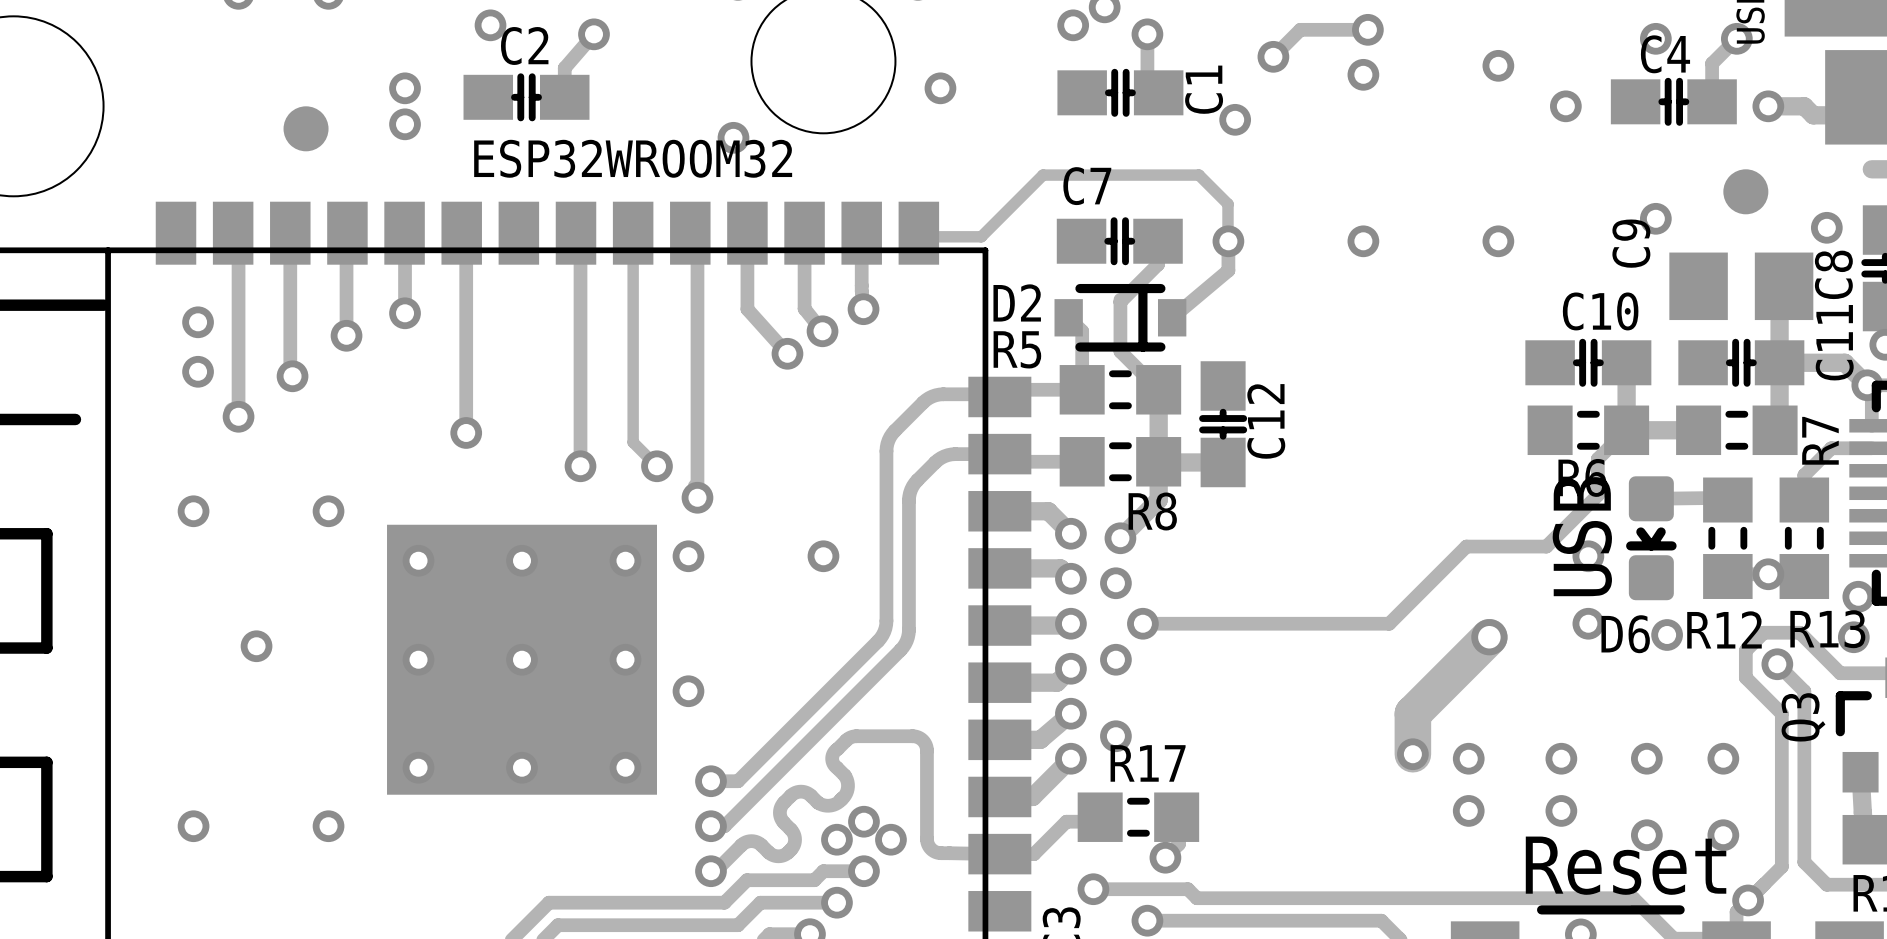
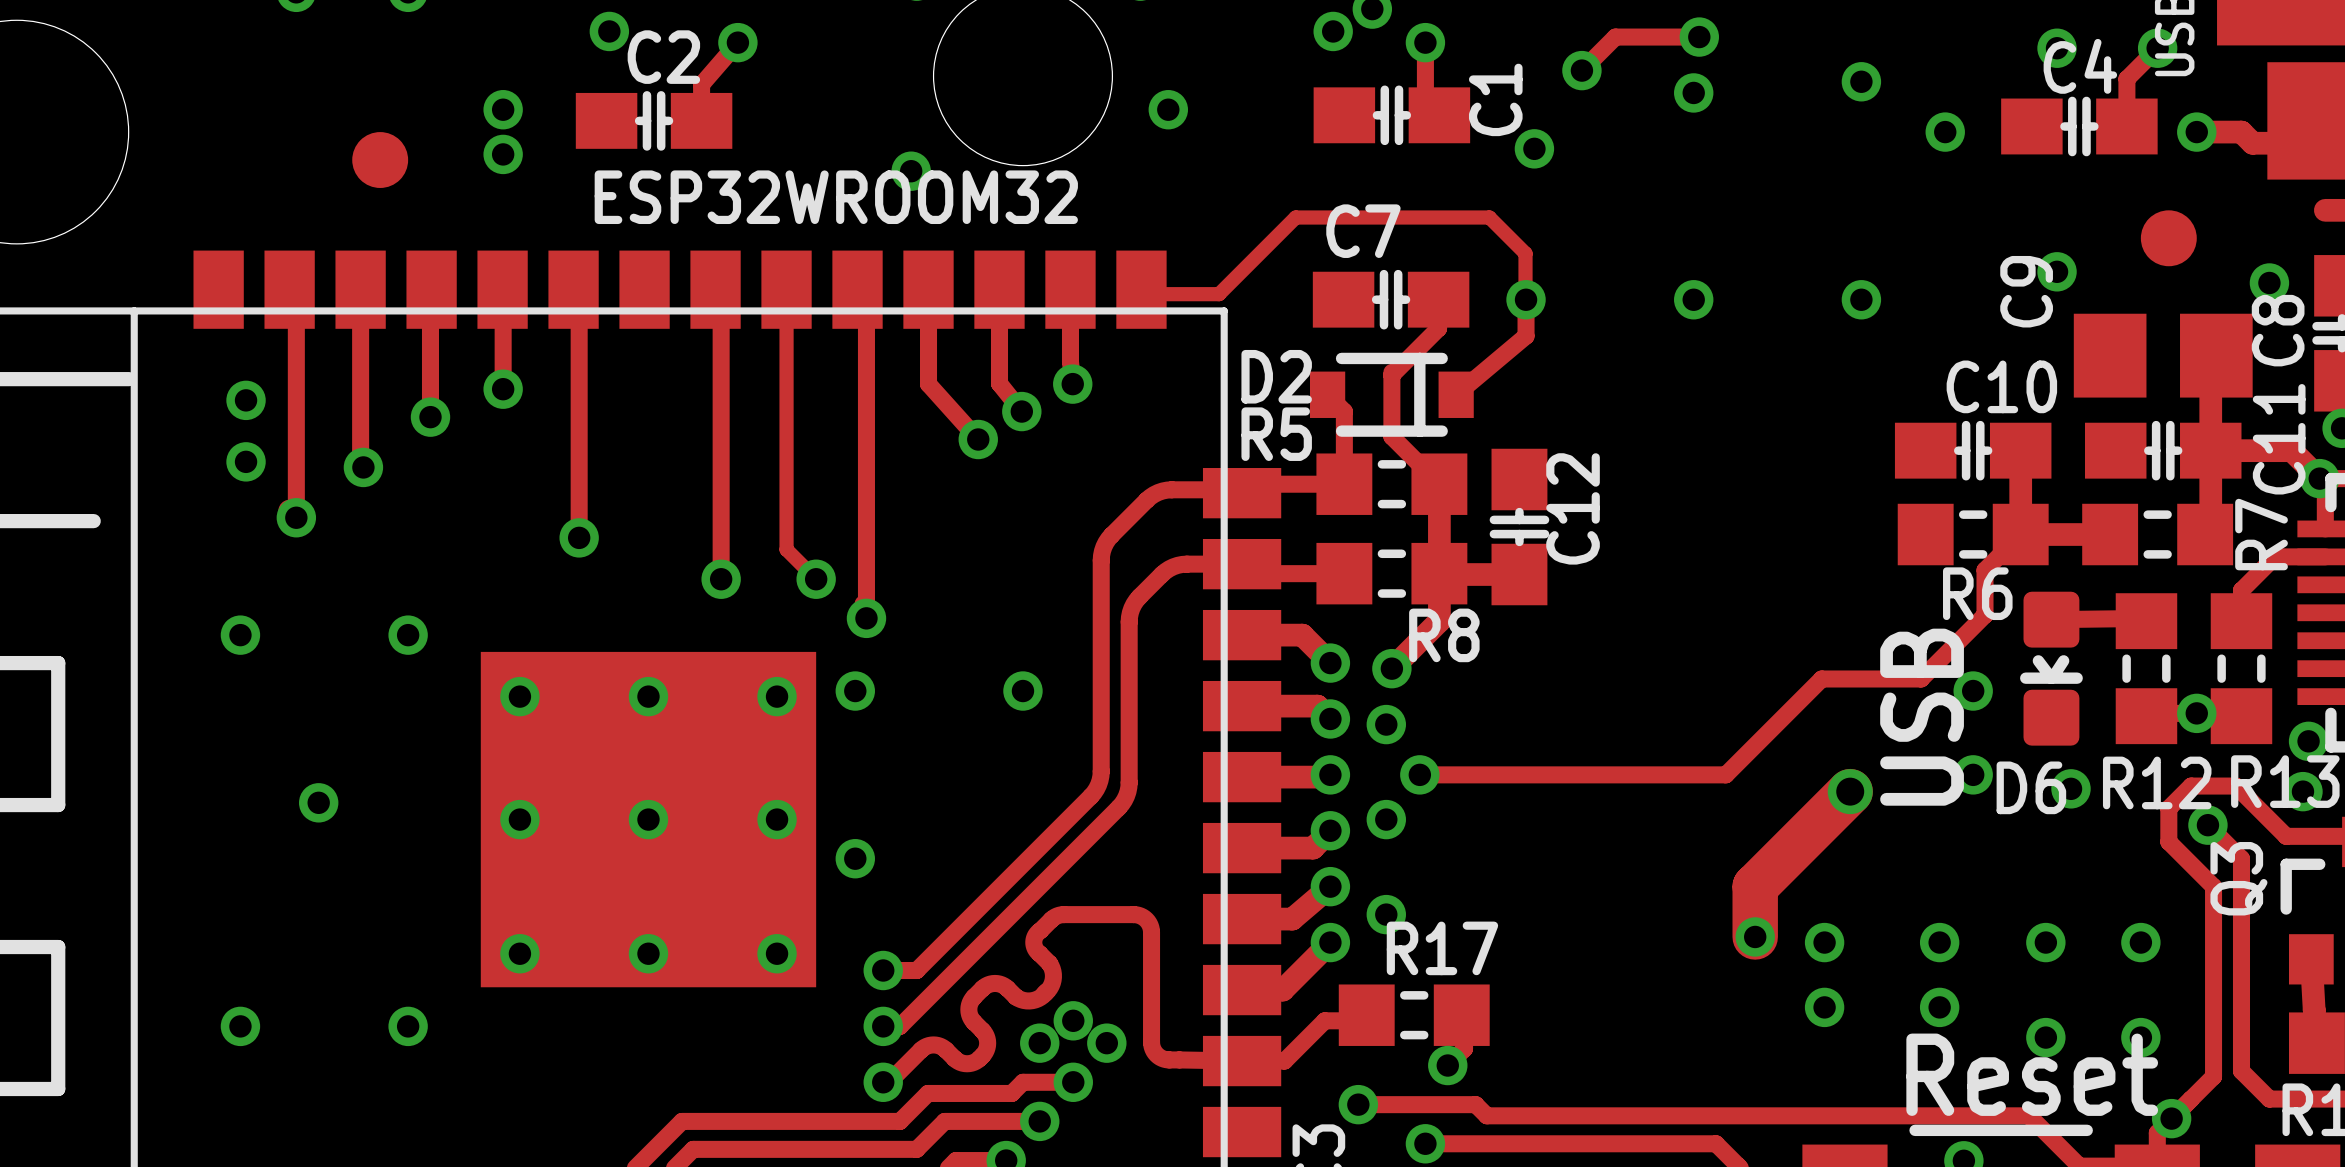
text position: USB (1582, 536) -> USB (1922, 717)

